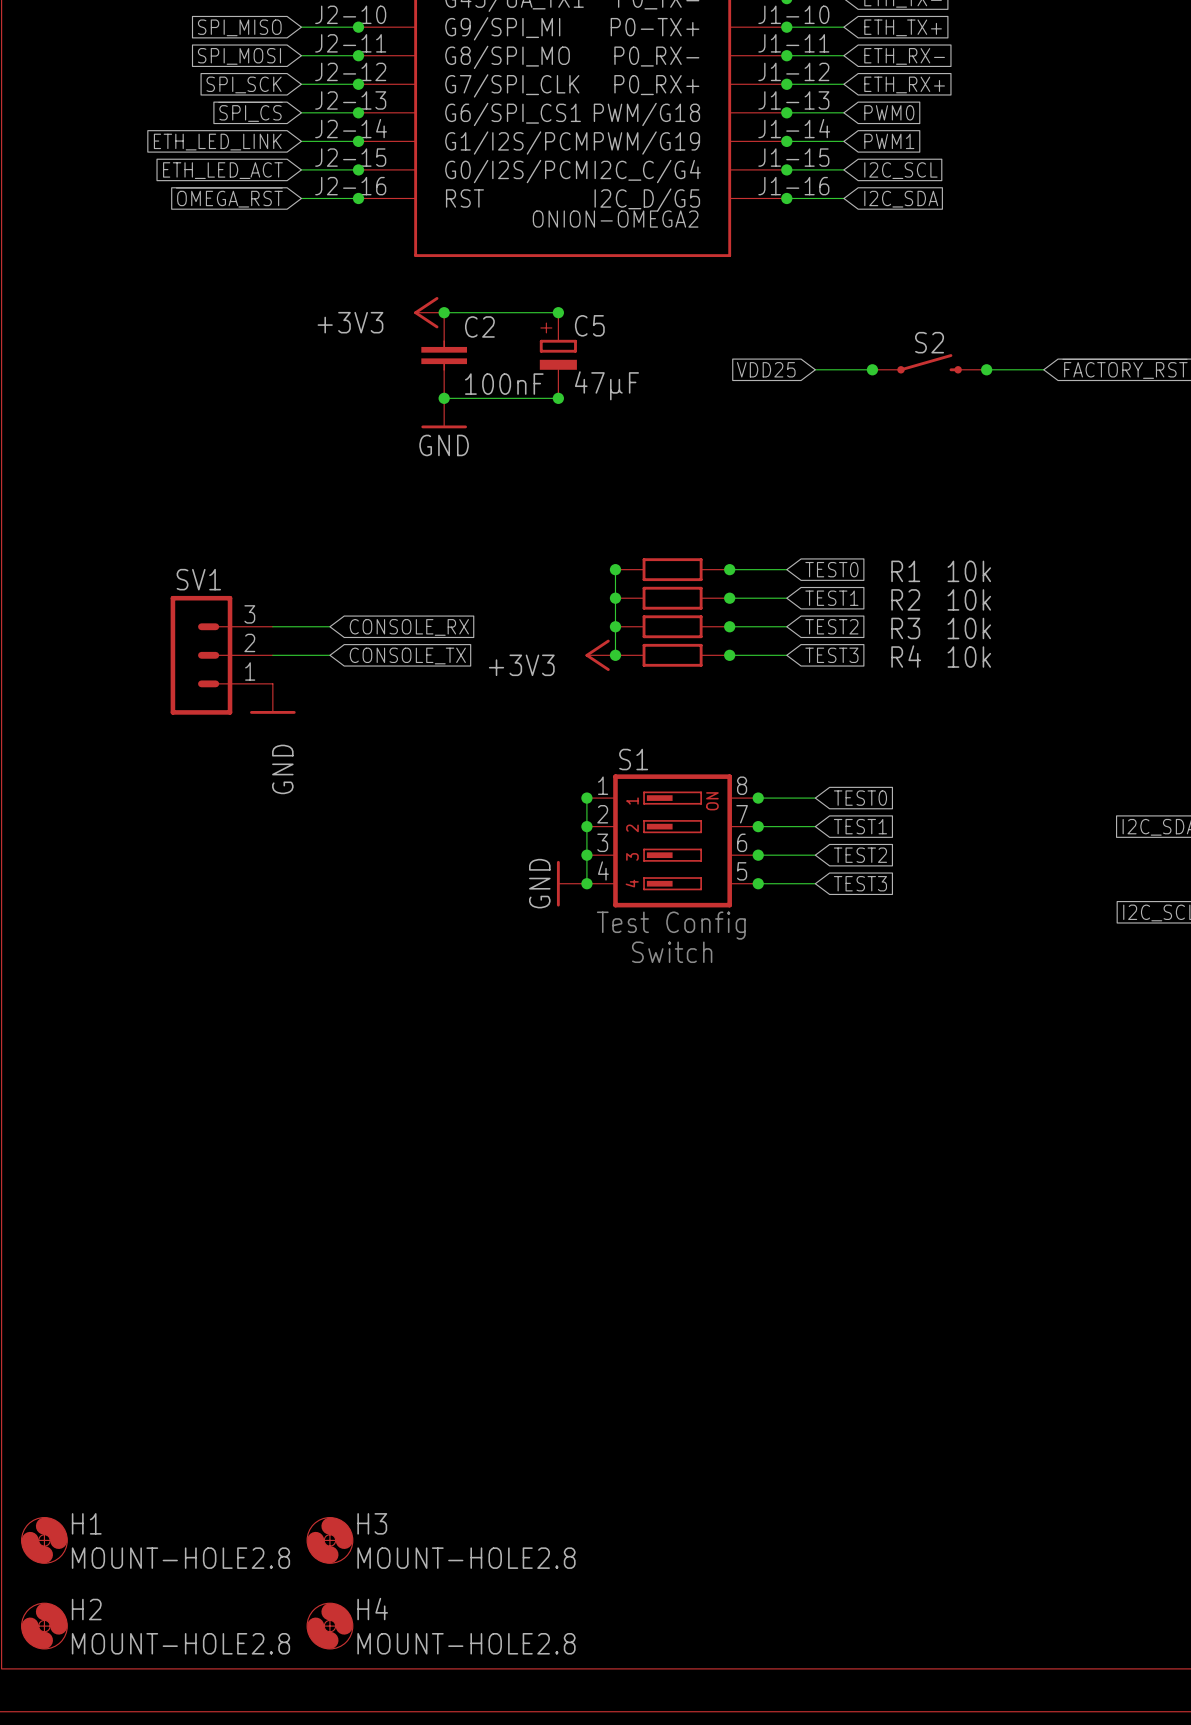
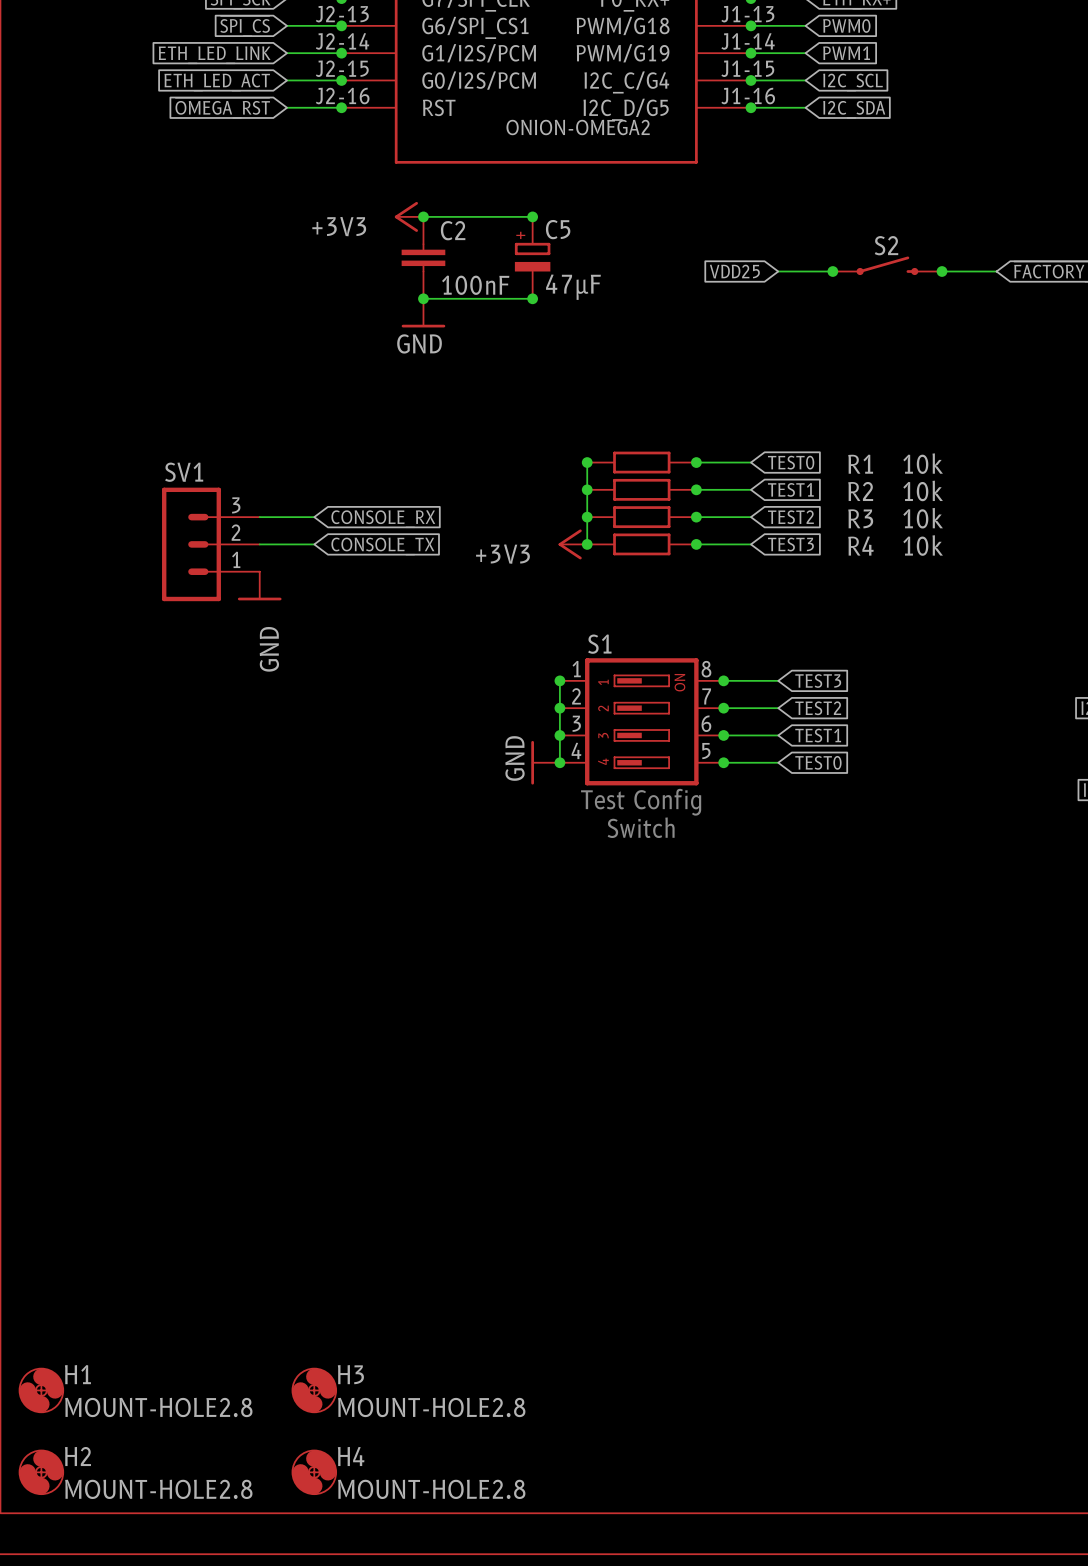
global label: TEST0 (860, 798) -> TEST3 (818, 680)
global label: TEST1 (860, 826) -> TEST2 (818, 708)
global label: TEST2 (860, 855) -> TEST1 (818, 735)
global label: TEST3 (860, 883) -> TEST0 (818, 762)

